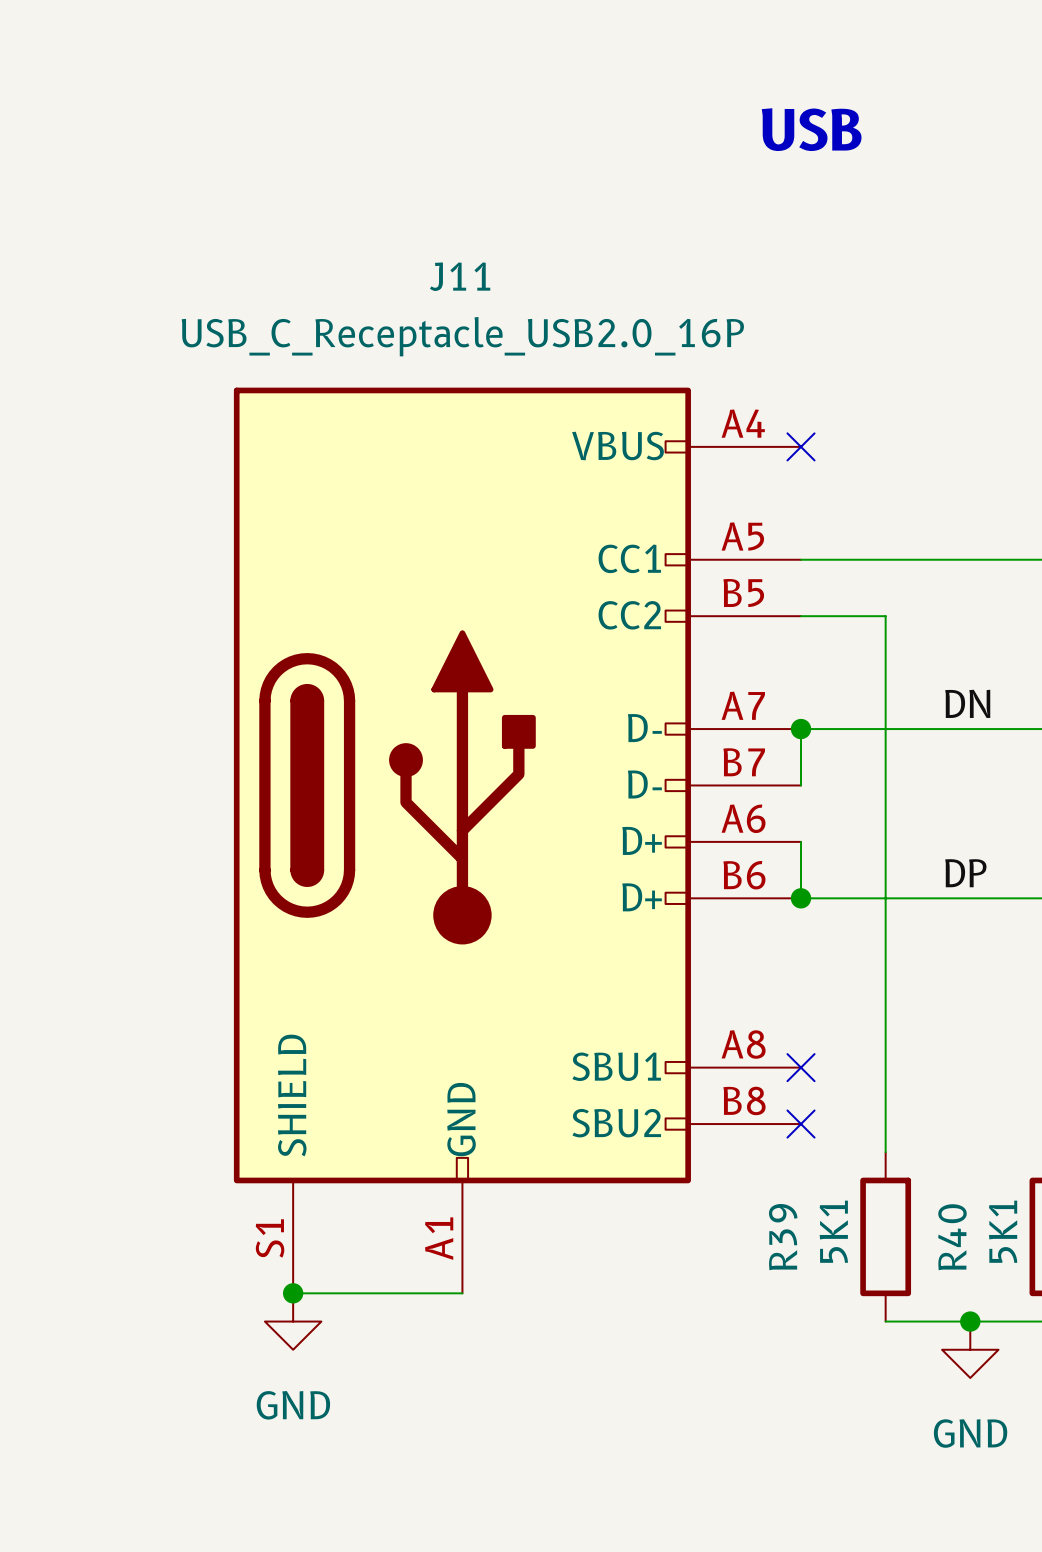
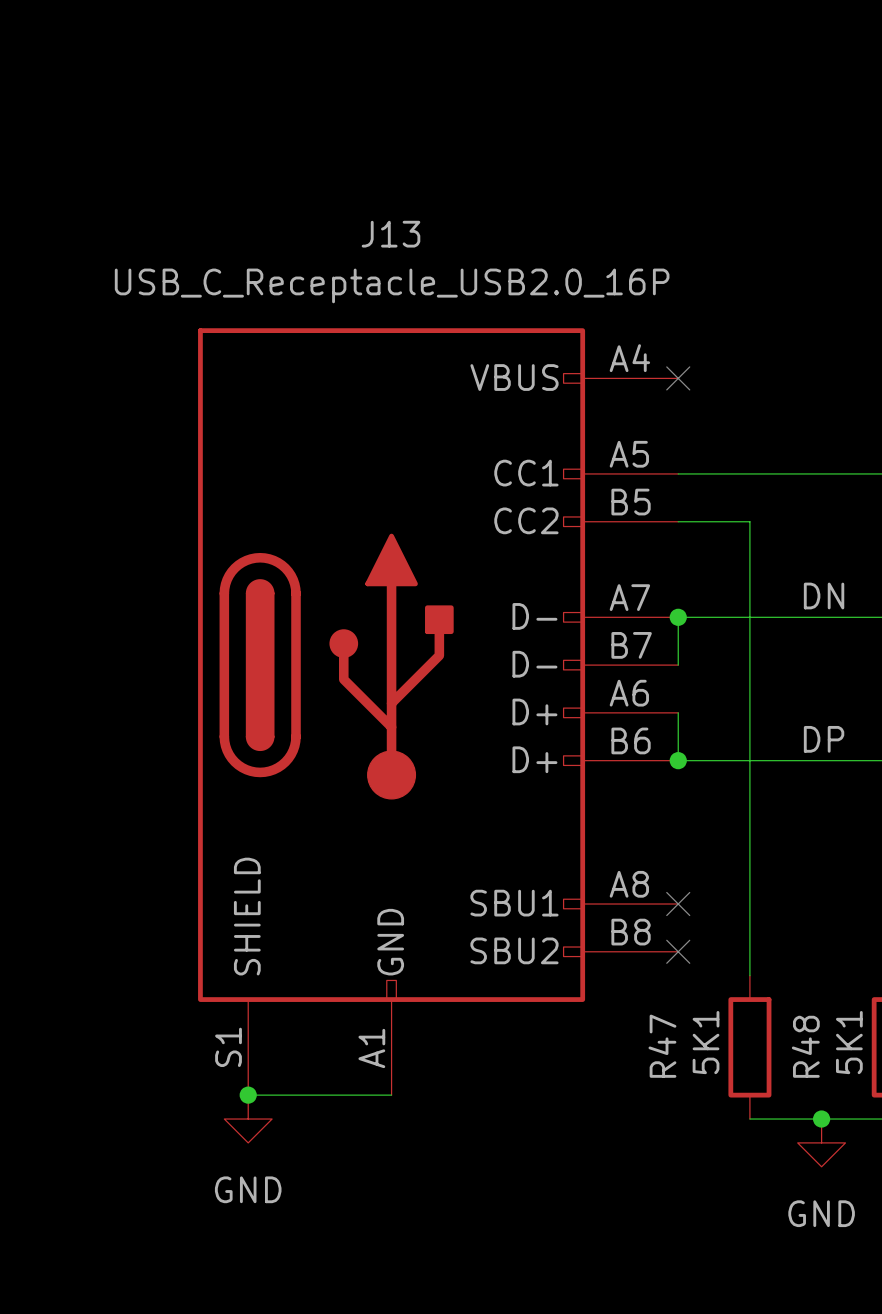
text: USB (811, 129) -> none
J11 name: J11 (460, 276) -> J13 (390, 234)
R39 name: R39 (783, 1237) -> R47 (662, 1046)
R40 name: R40 (952, 1237) -> R48 (805, 1046)

